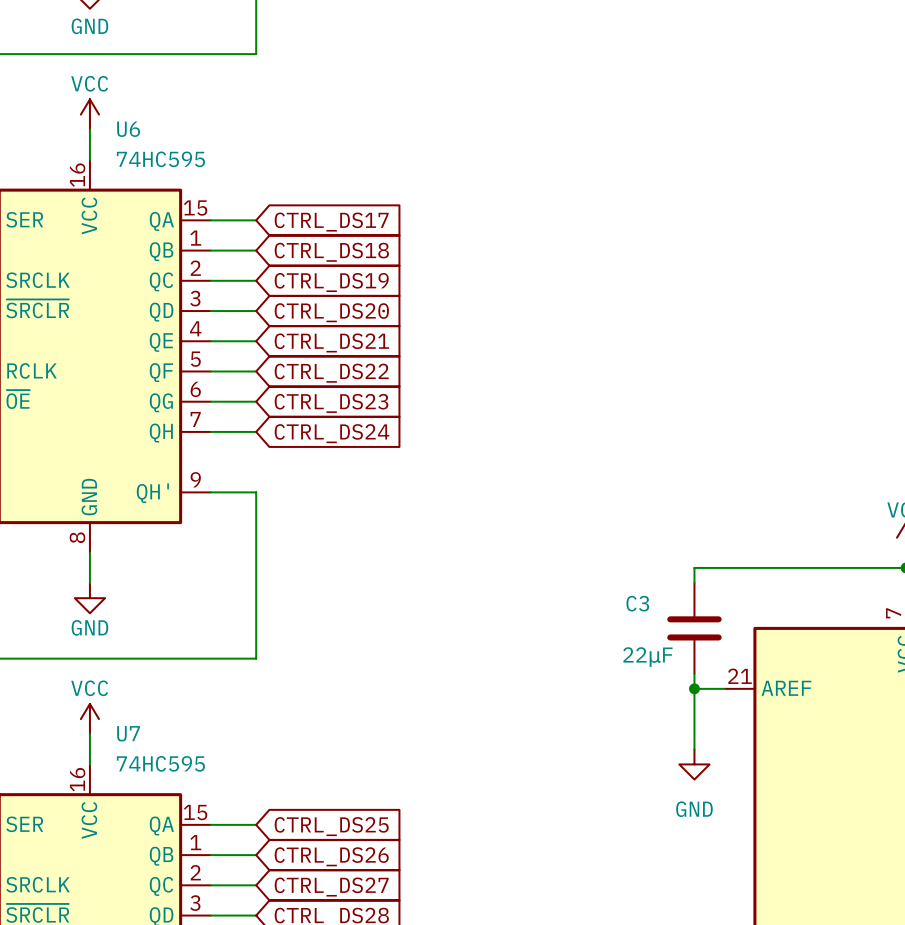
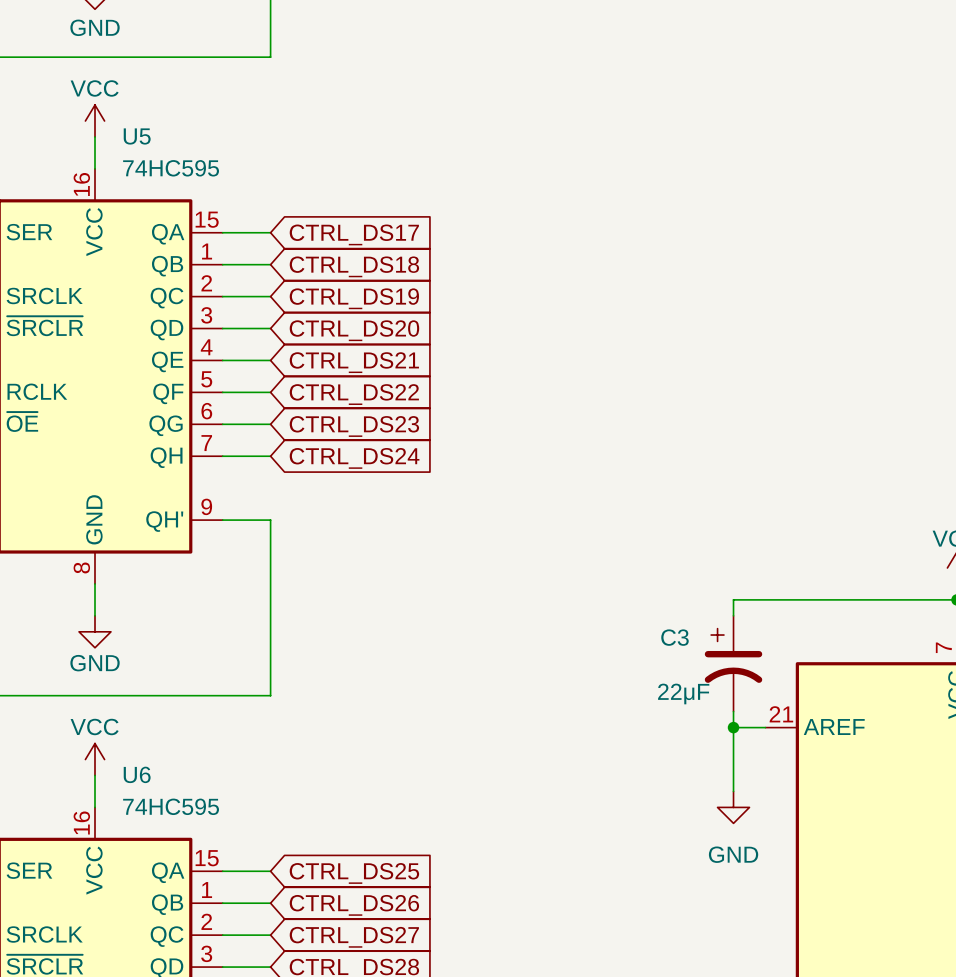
U6 name: U6 (128, 129) -> U5 (137, 136)
C3 symbol: [667, 583, 722, 674] -> [704, 615, 763, 712]
U7 name: U7 (128, 733) -> U6 (137, 774)

